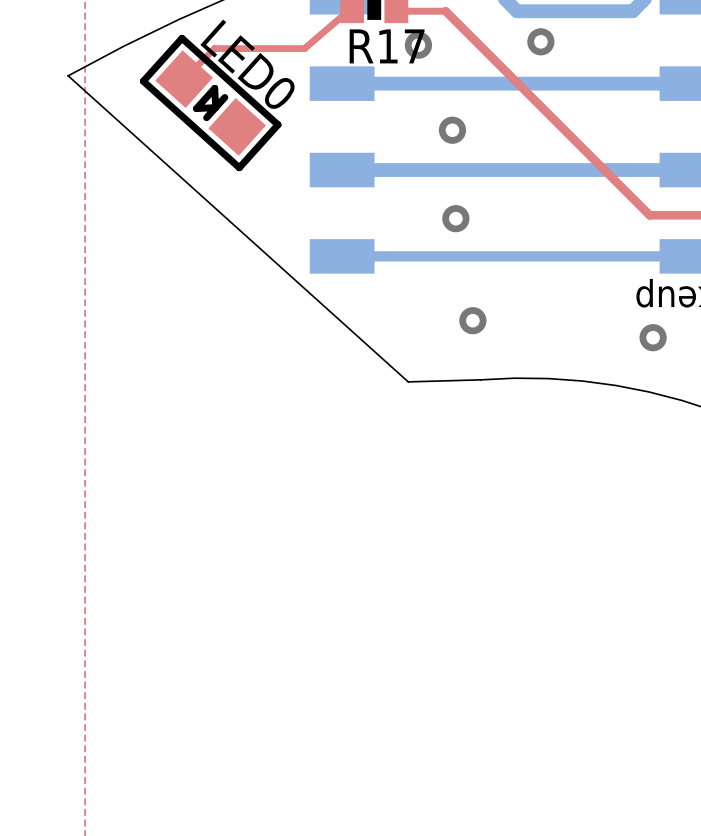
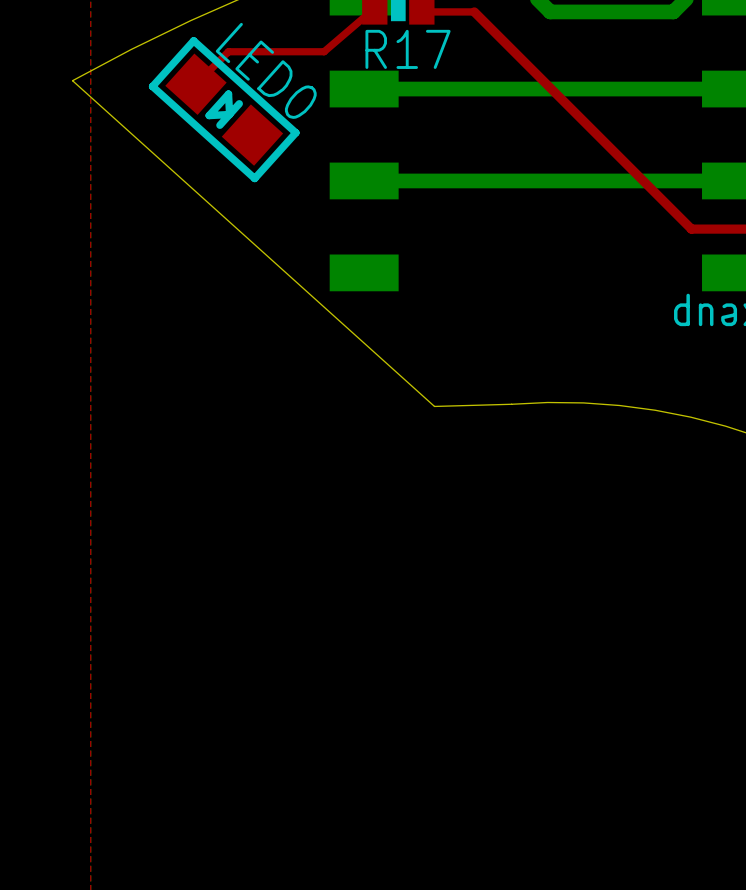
via: (540, 41) -> none
via: (418, 45) -> none
via: (452, 130) -> none
via: (455, 218) -> none
bottom track: (342, 256) (691, 256) -> none
via: (472, 320) -> none
via: (653, 337) -> none

